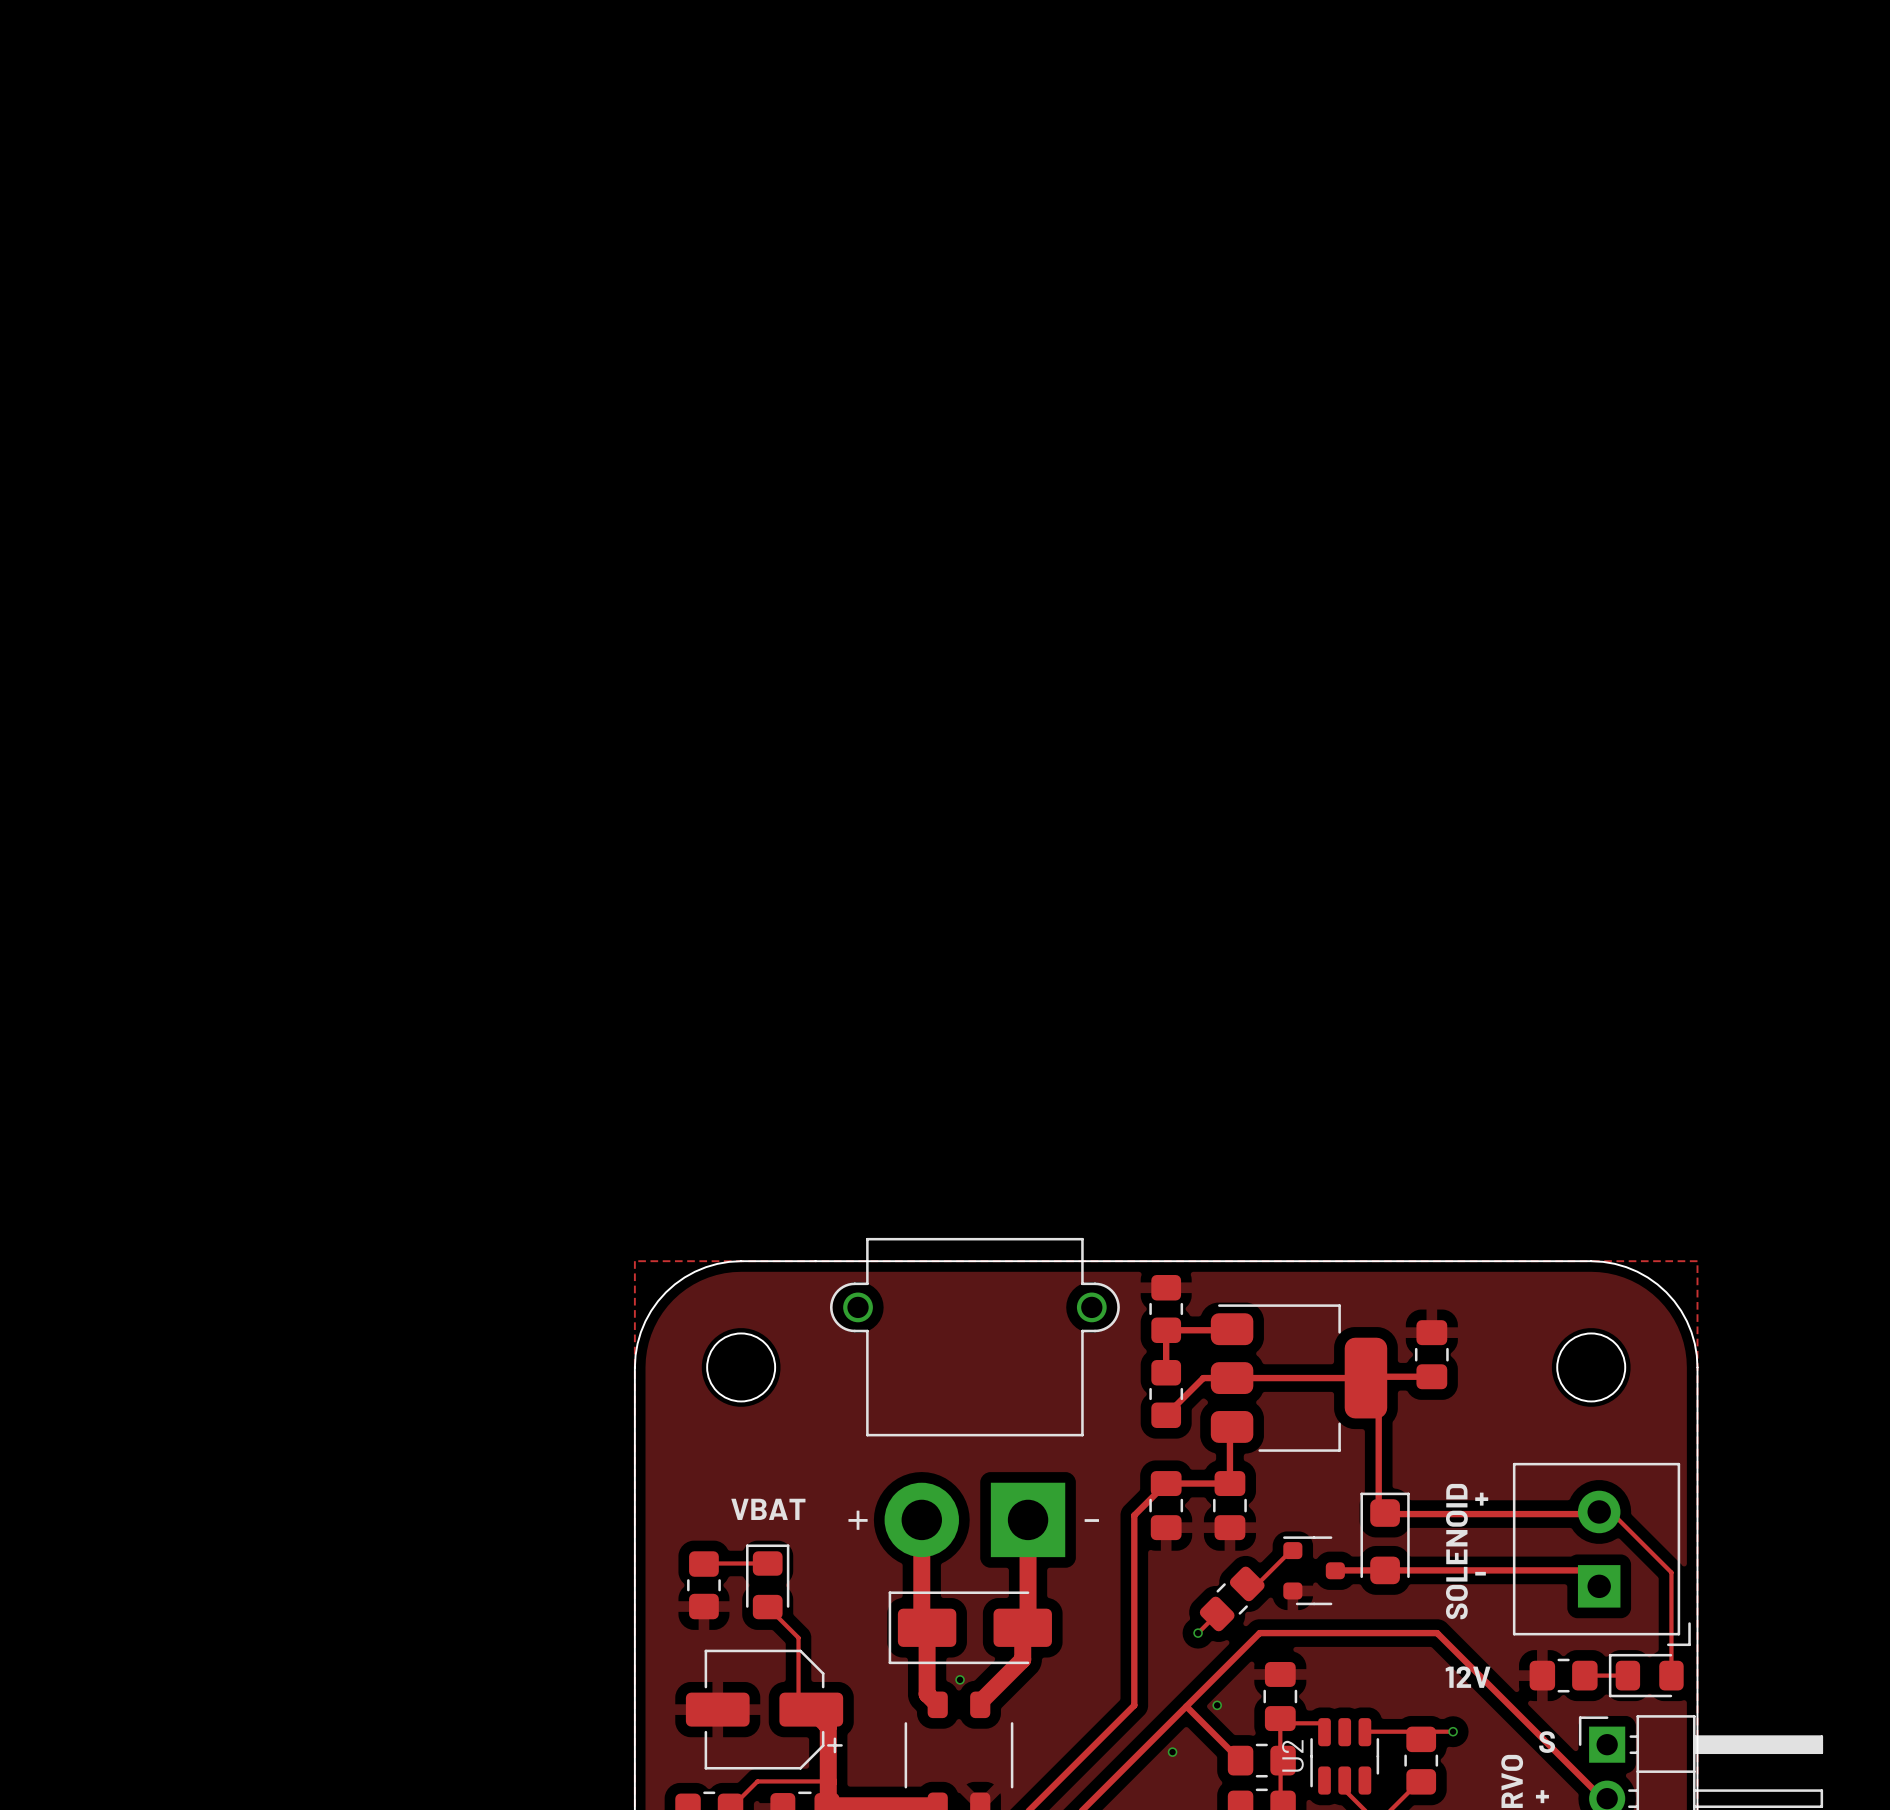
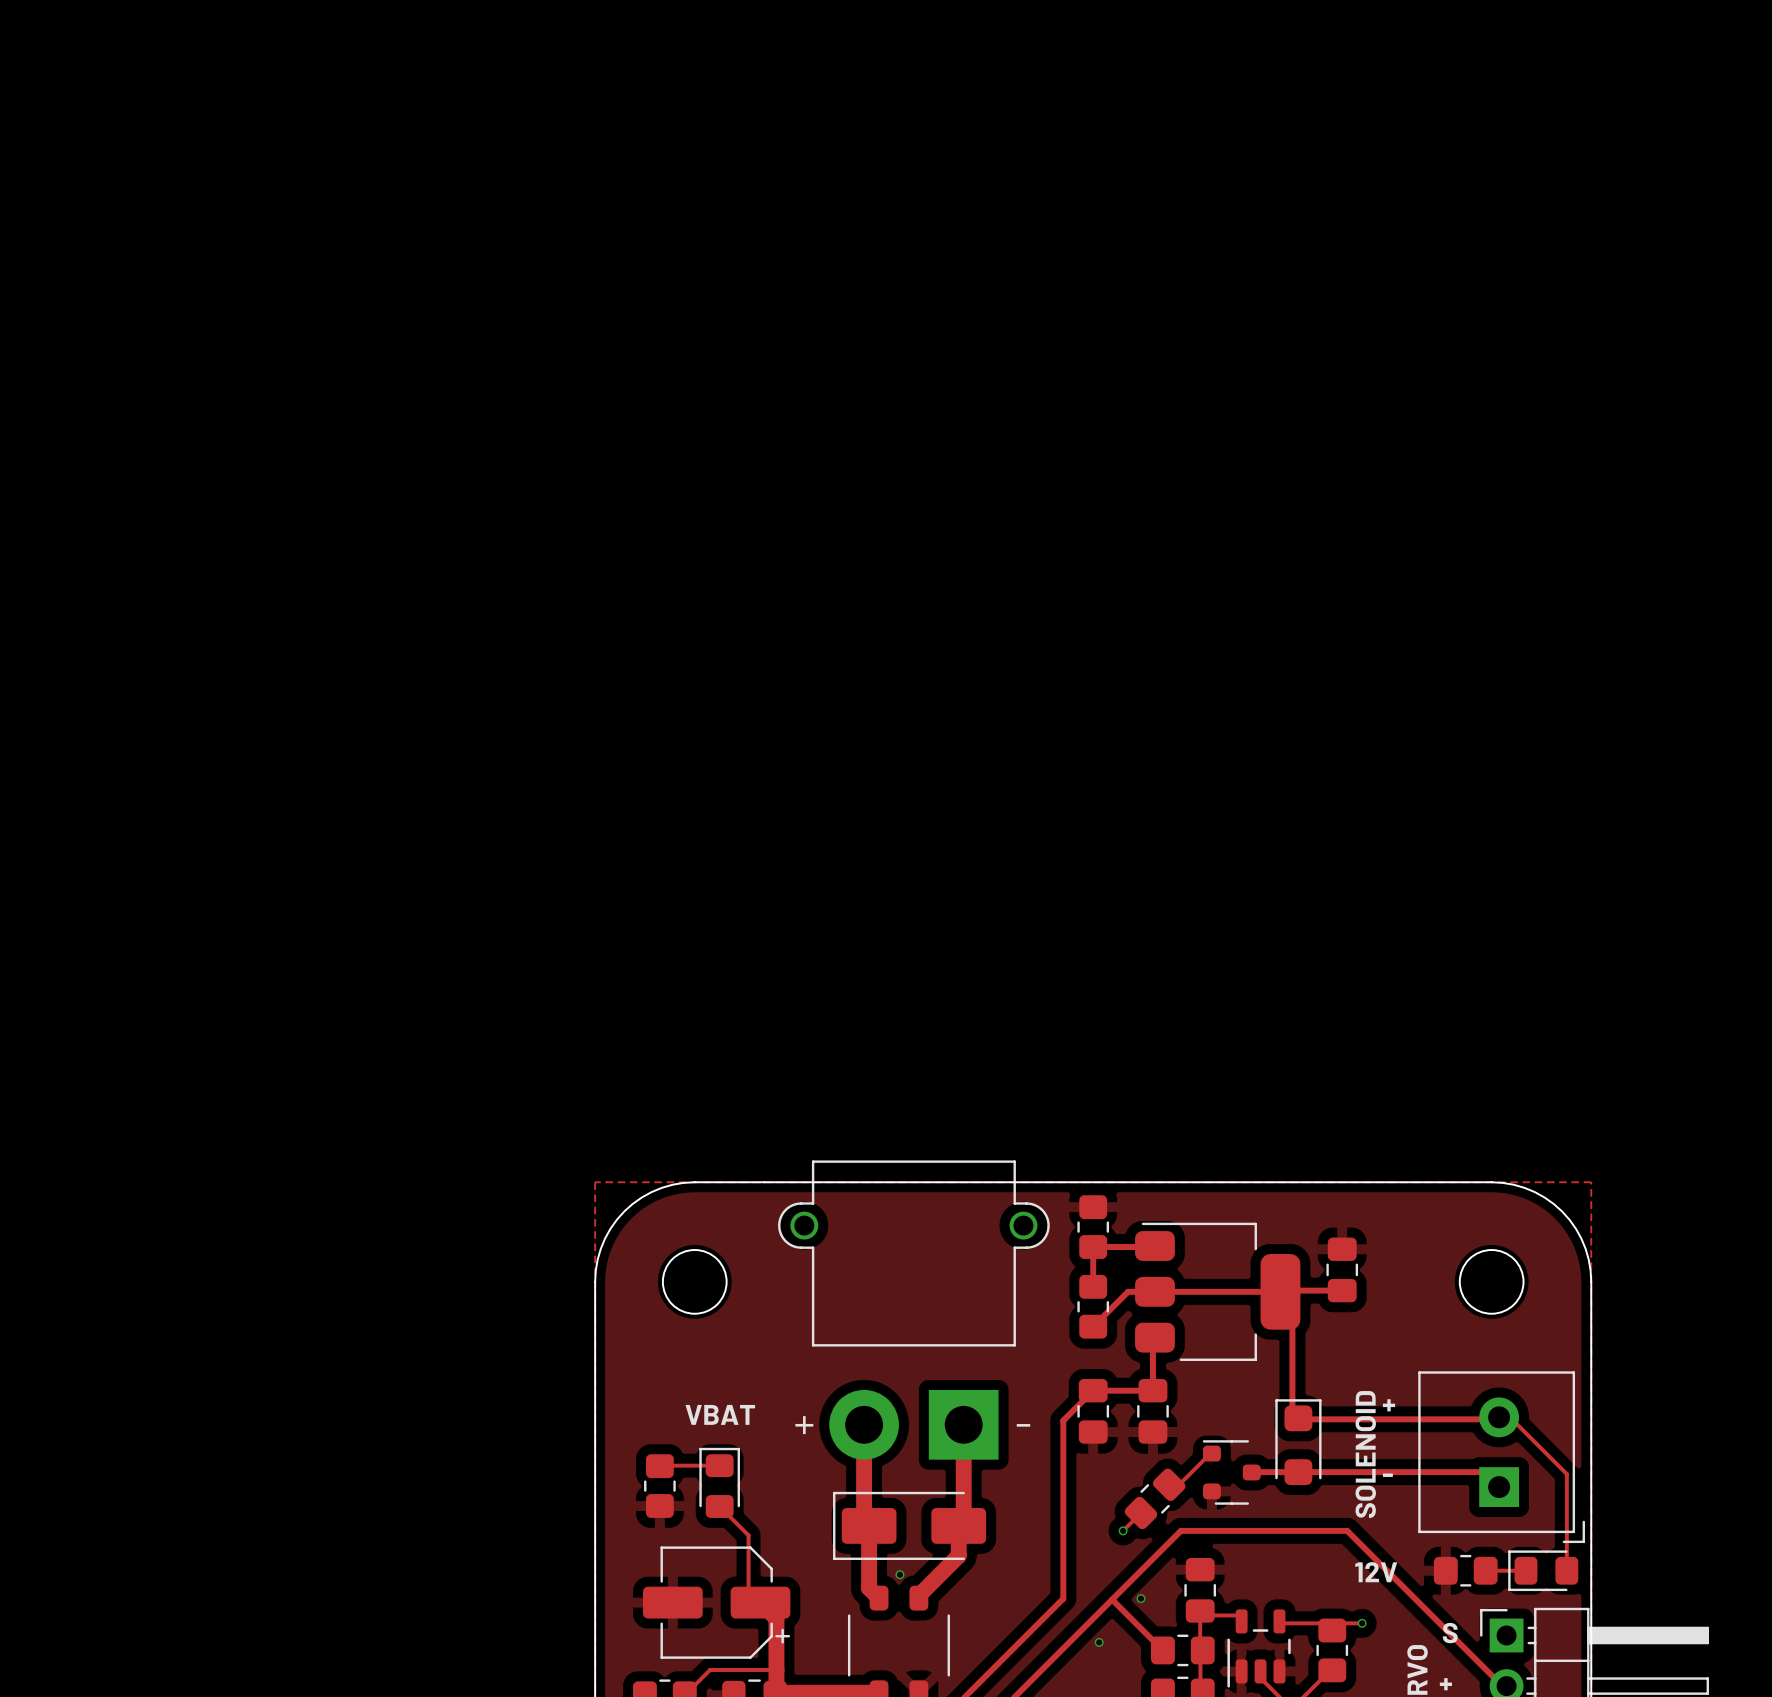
U2: (1344, 1756) -> none
part: none -> (1259, 1648)

